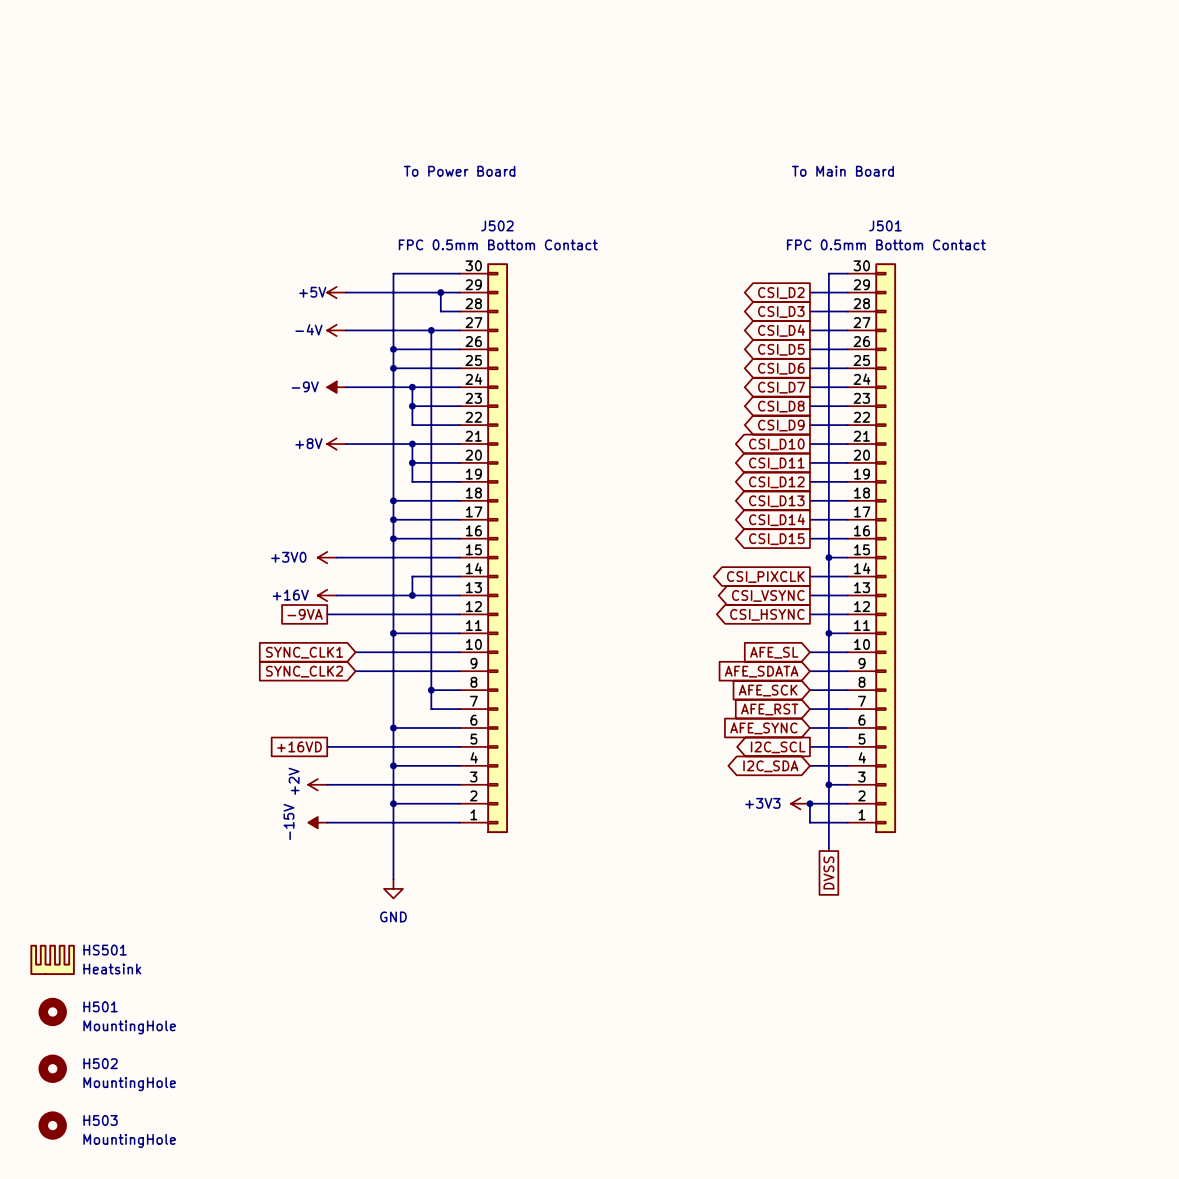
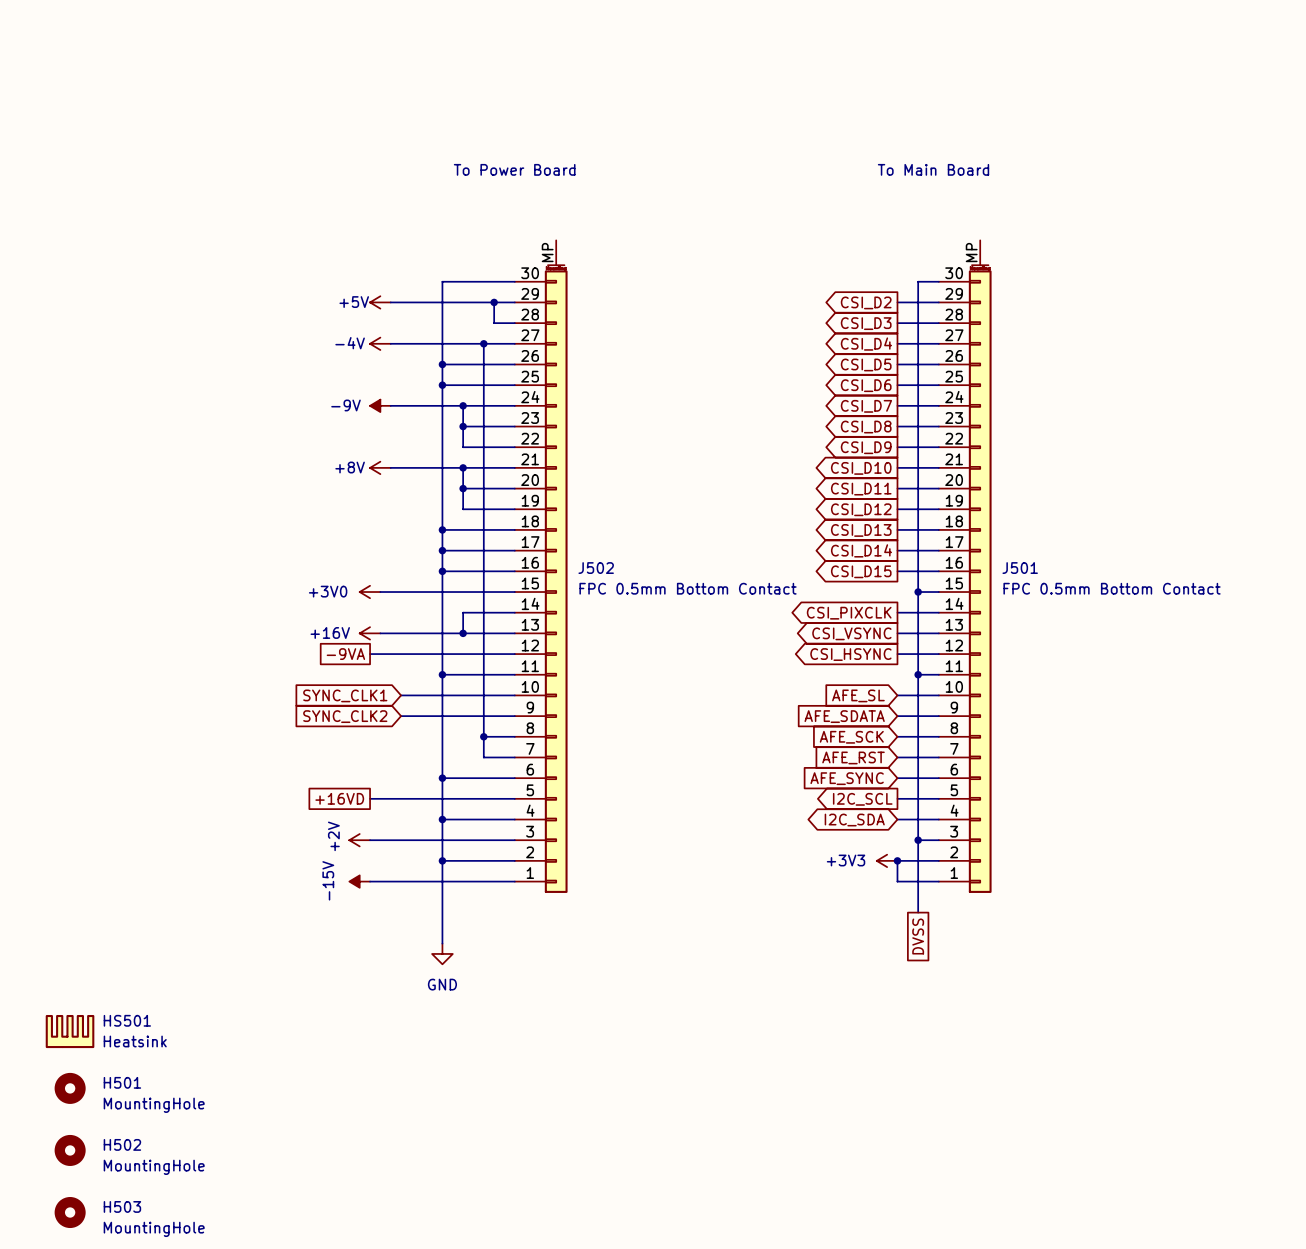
J502 name position: J502 (497, 225) -> J502 (596, 568)
J501 name position: J501 (885, 225) -> J501 (1020, 568)
J502 value position: FPC 0.5mm Bottom Contact (498, 244) -> FPC 0.5mm Bottom Contact (688, 588)
J501 value position: FPC 0.5mm Bottom Contact (886, 244) -> FPC 0.5mm Bottom Contact (1112, 588)
J502 symbol: [459, 263, 509, 834] -> [514, 240, 568, 893]
J501 symbol: [847, 263, 897, 834] -> [938, 240, 992, 893]

